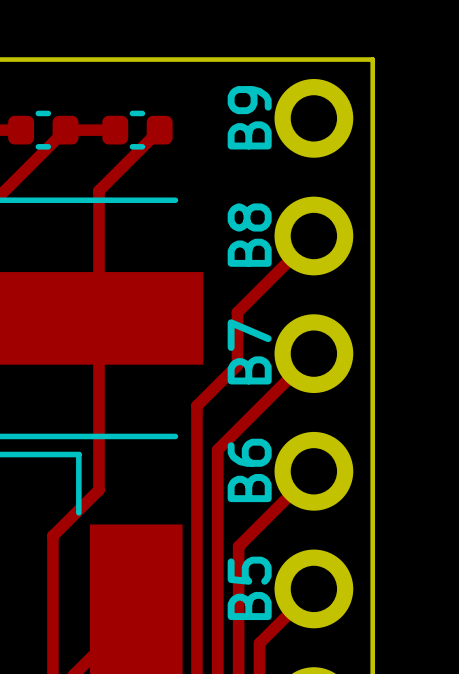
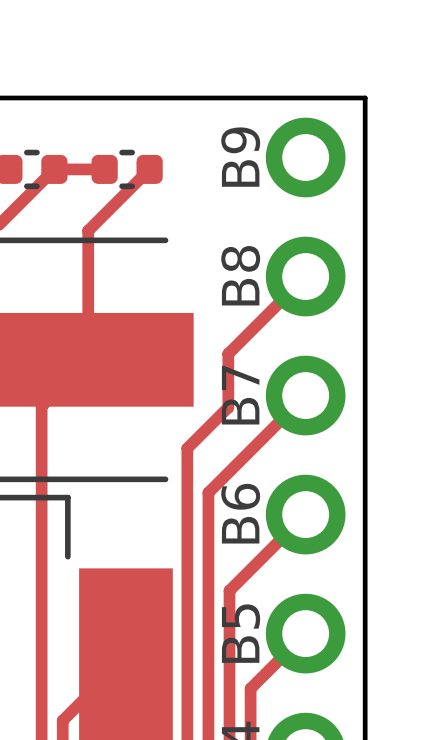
track: (98, 318) (98, 489) (52, 535) -> (88, 359) (41, 406) (41, 580)

